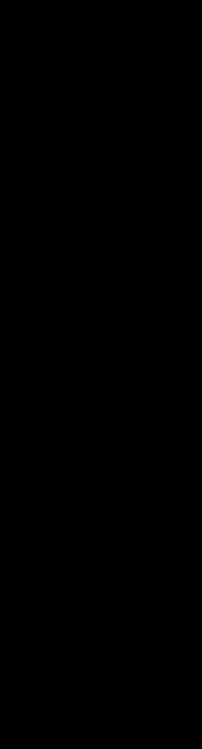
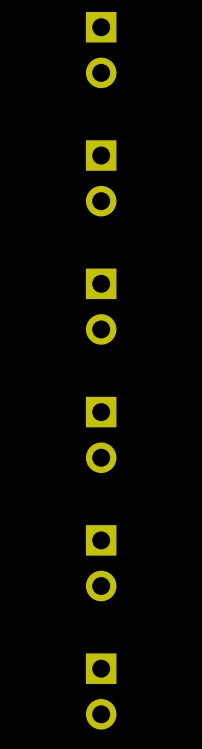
part: none -> (101, 50)
part: none -> (101, 178)
part: none -> (101, 306)
part: none -> (101, 434)
part: none -> (101, 563)
part: none -> (101, 691)

